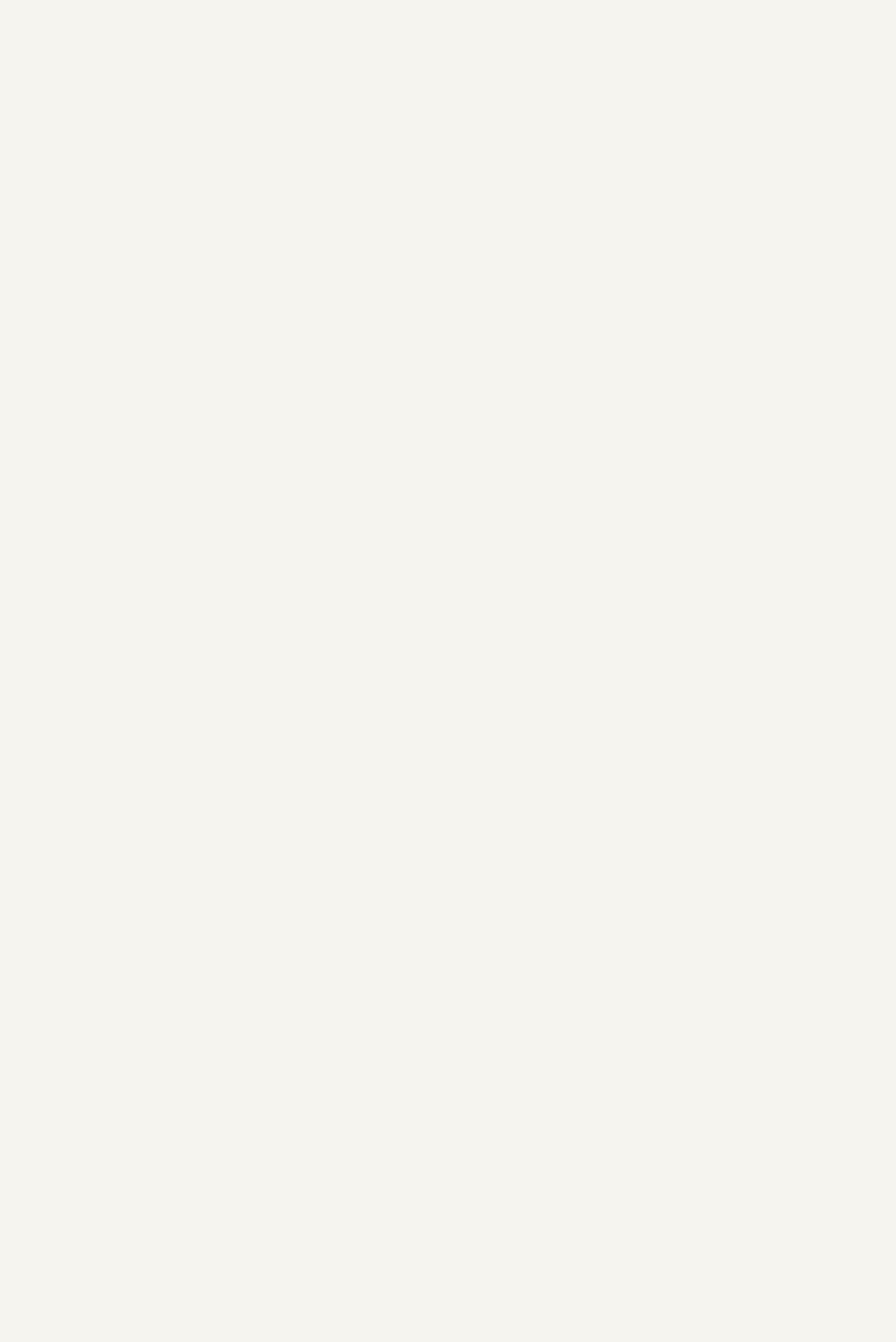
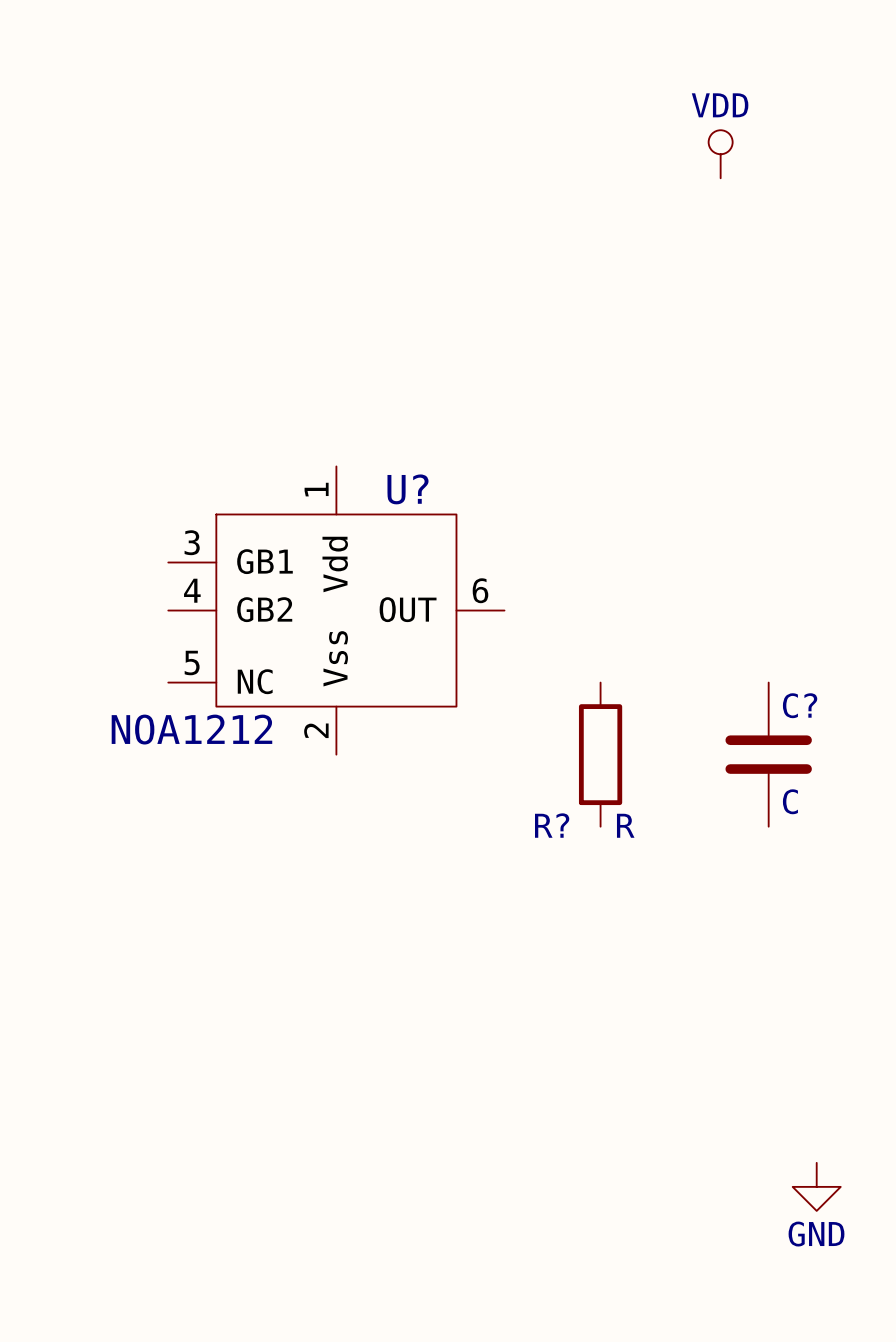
power symbol: none -> VDD (720, 154)
U?: none -> NOA1212 (336, 610)
R?: none -> R (600, 754)
C?: none -> C (768, 754)
power symbol: none -> GND (816, 1186)

